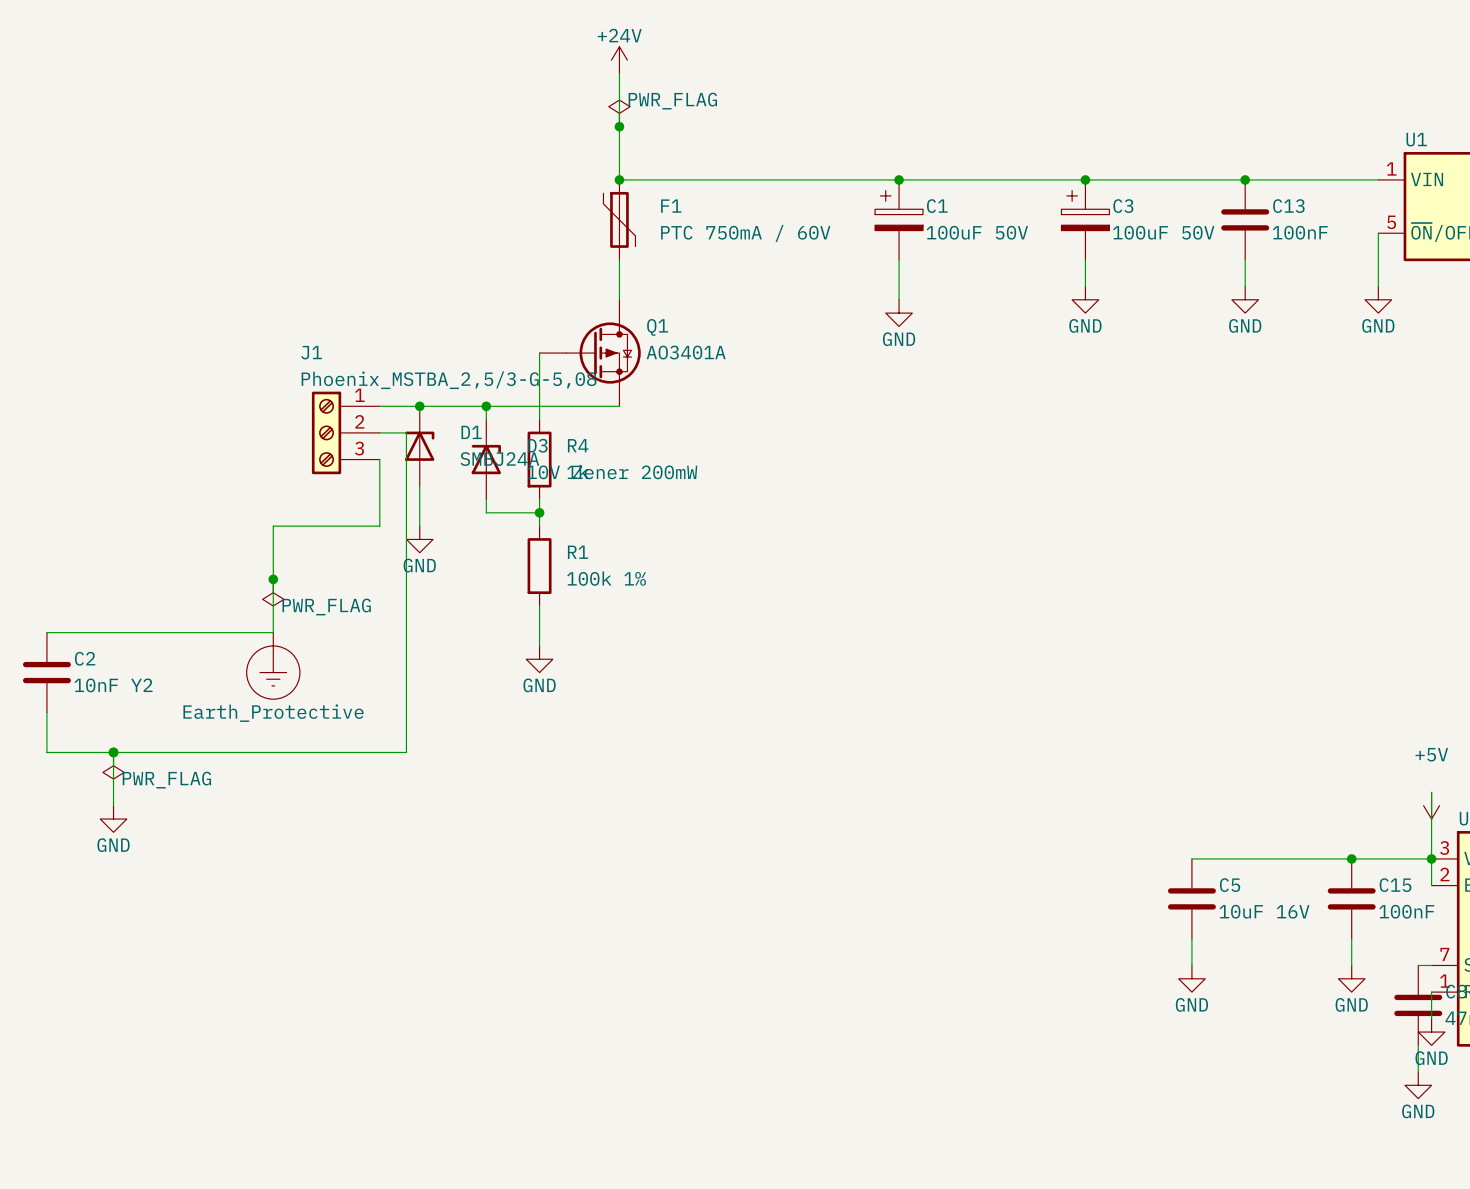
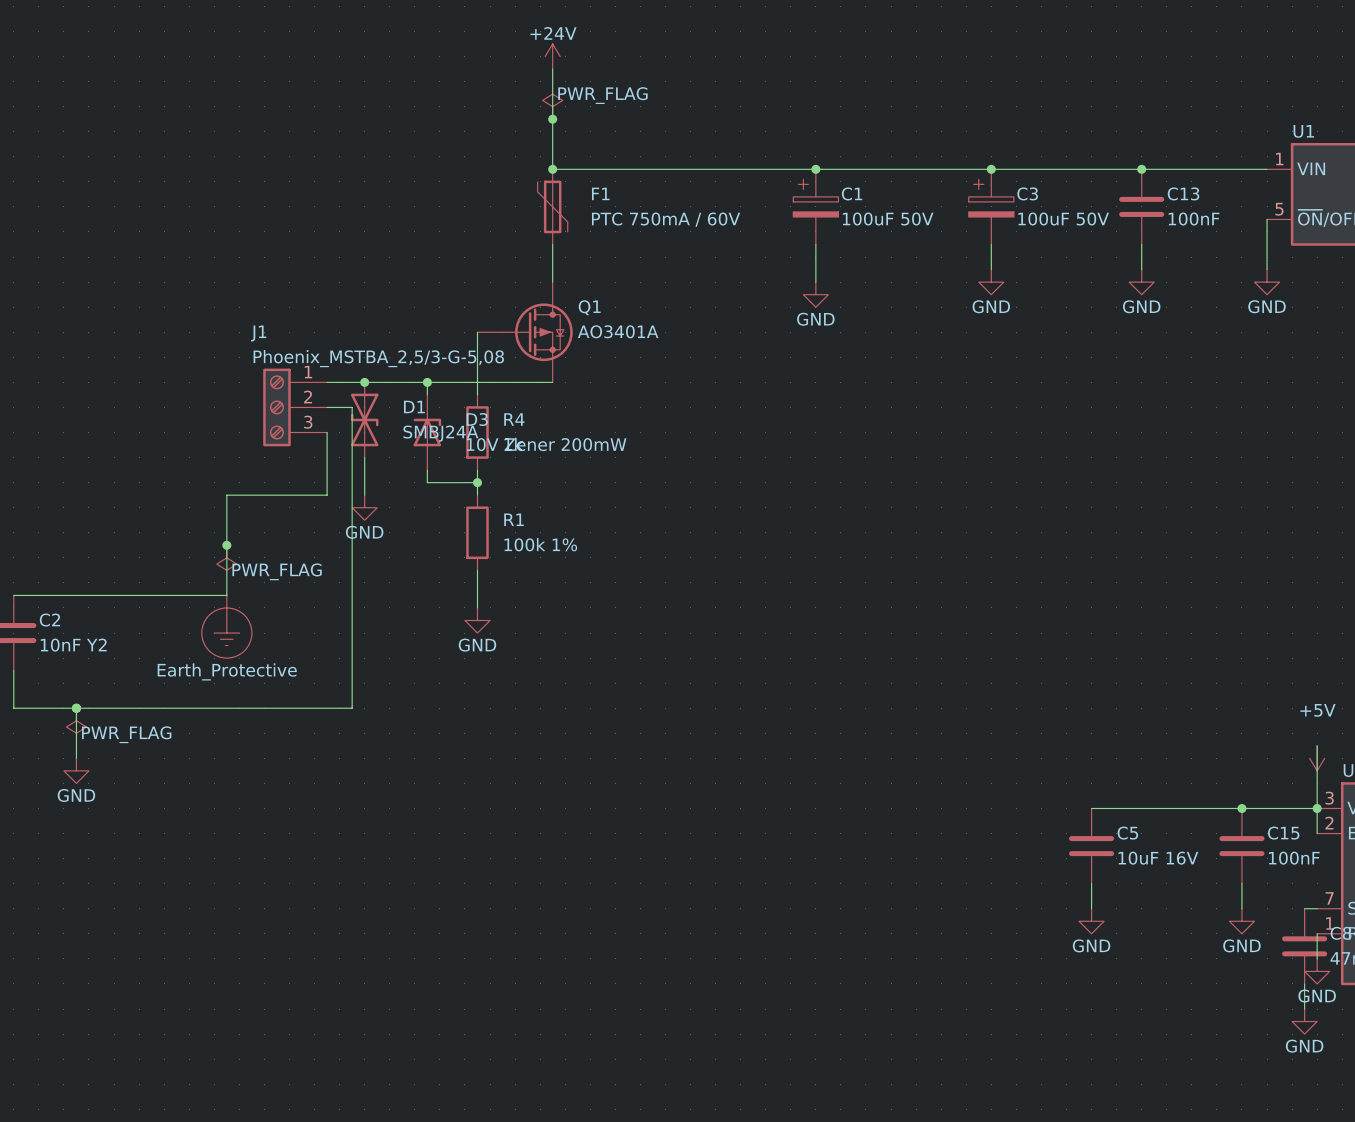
D1 symbol: [405, 406, 435, 487] -> [350, 382, 379, 458]

